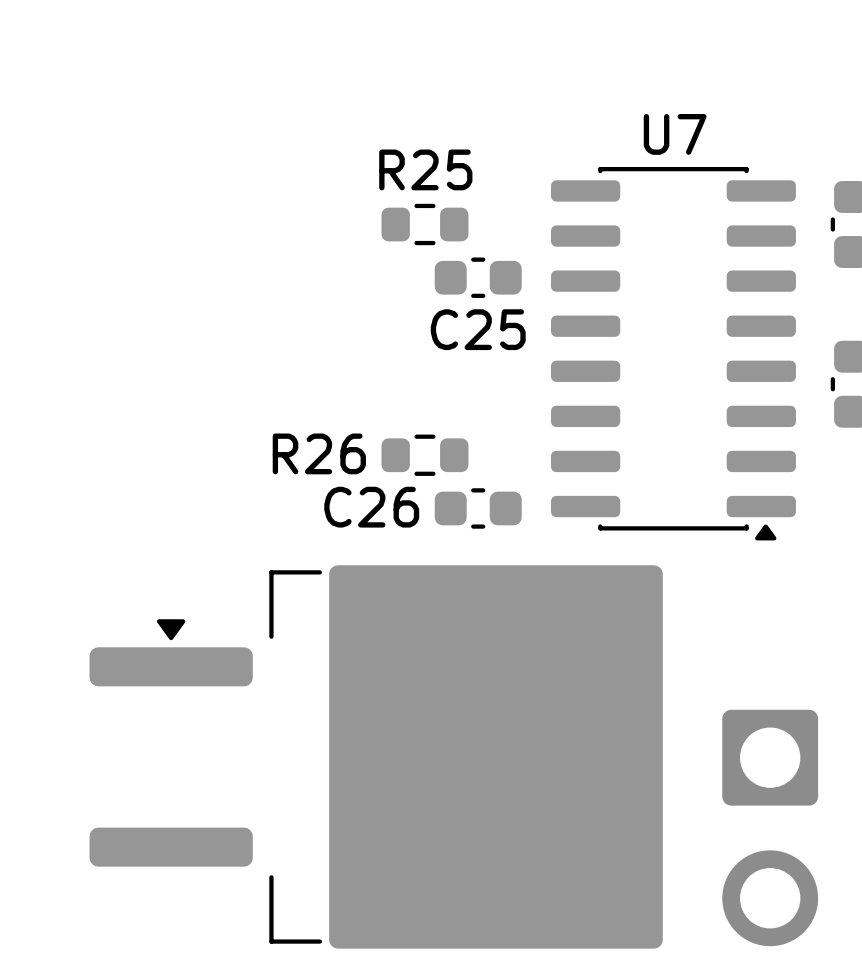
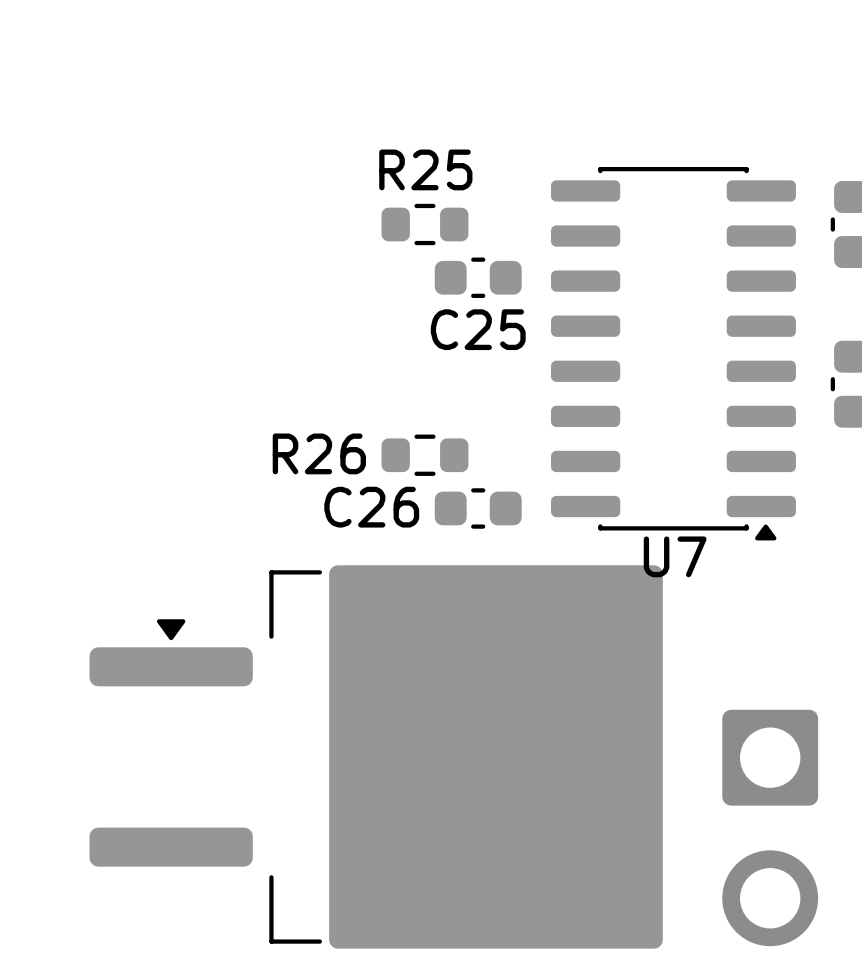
U7 name position: U7 (675, 134) -> U7 (675, 556)

